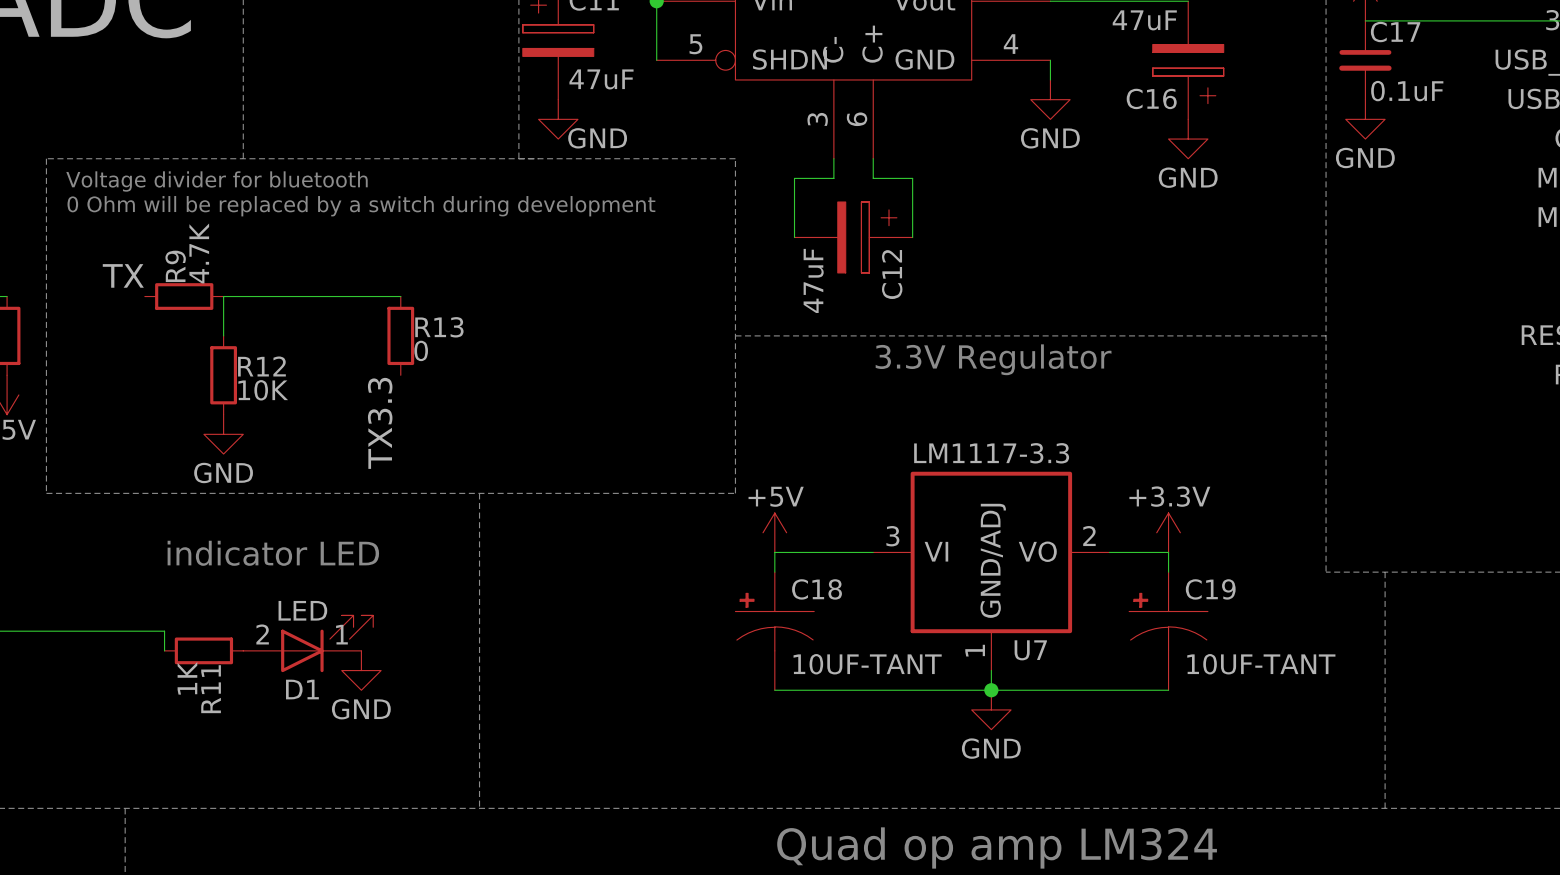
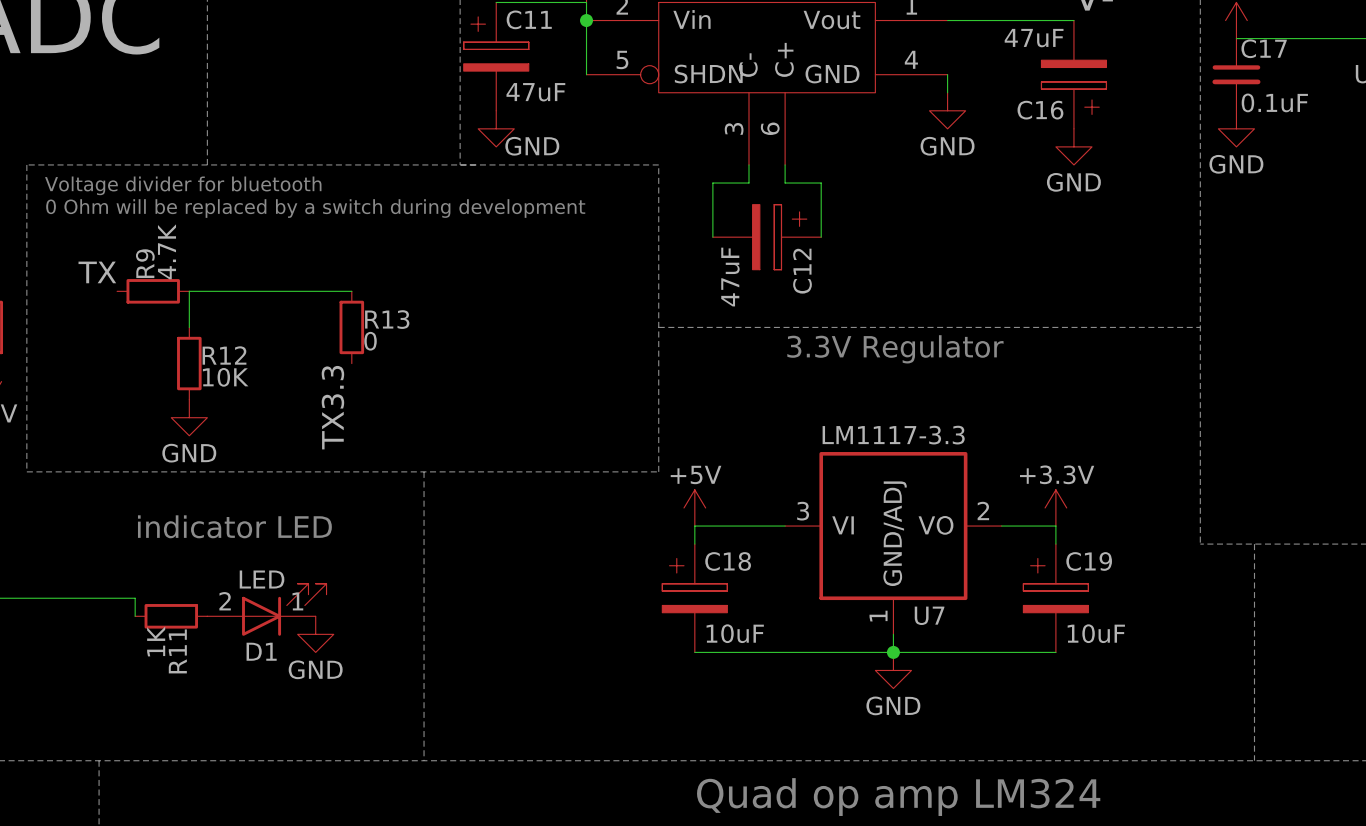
C18 symbol: [735, 572, 815, 691] -> [662, 544, 728, 653]
C19 symbol: [1129, 572, 1208, 691] -> [1023, 544, 1089, 653]
C18 value: 10UF-TANT (867, 664) -> 10uF (735, 633)
C19 value: 10UF-TANT (1261, 664) -> 10uF (1096, 633)

